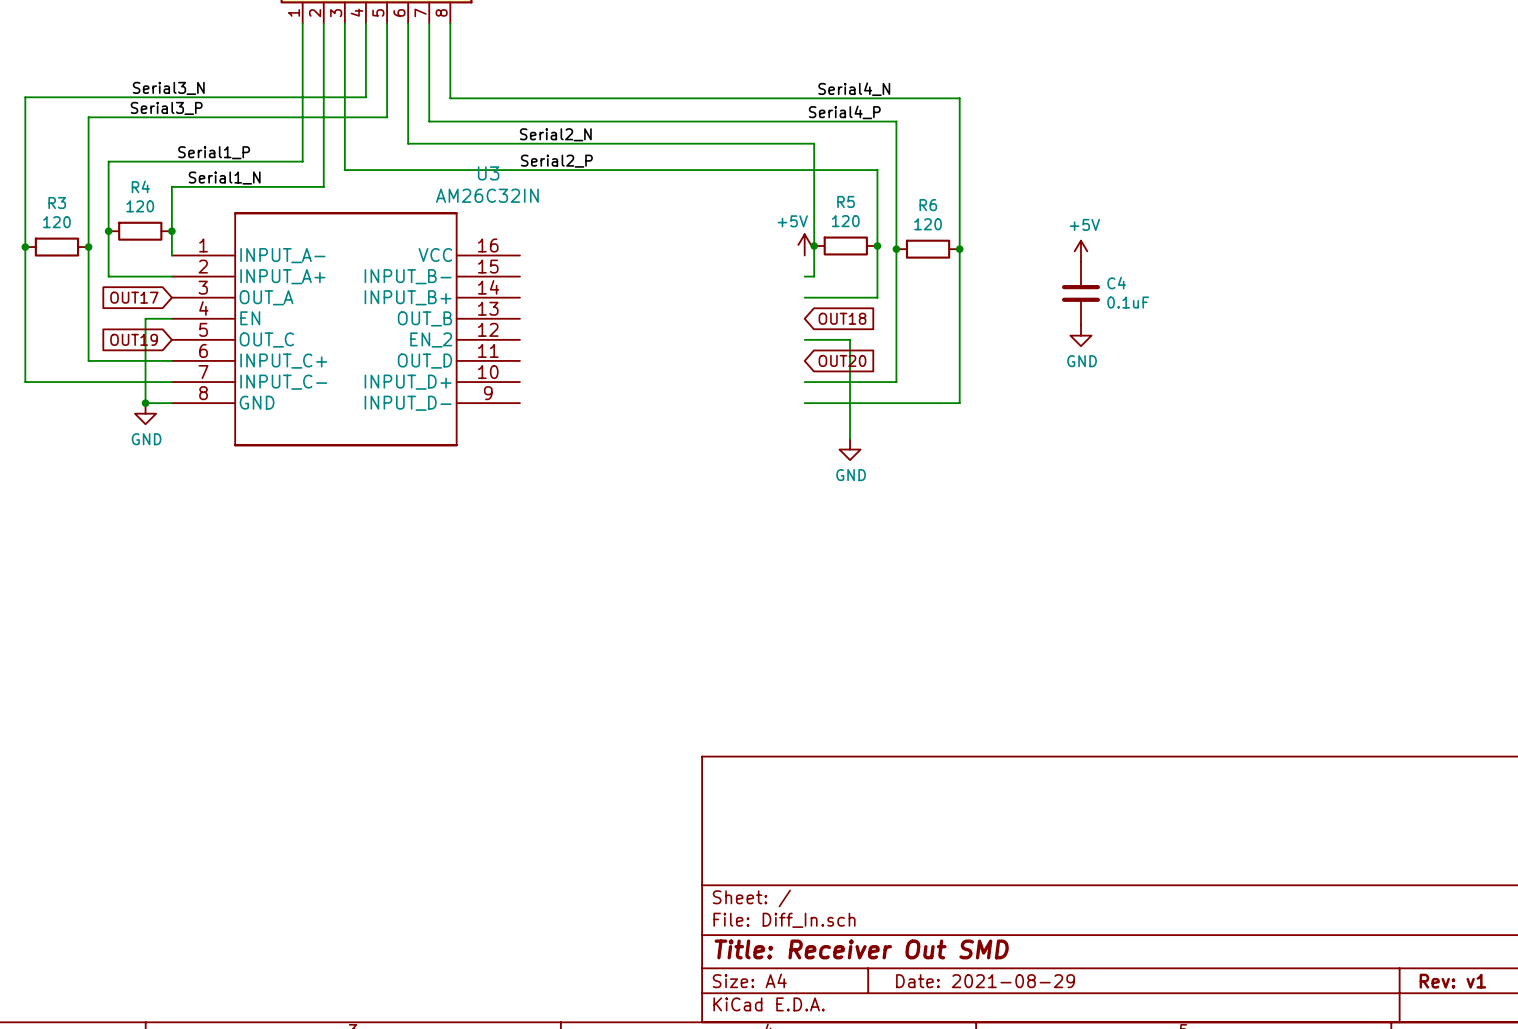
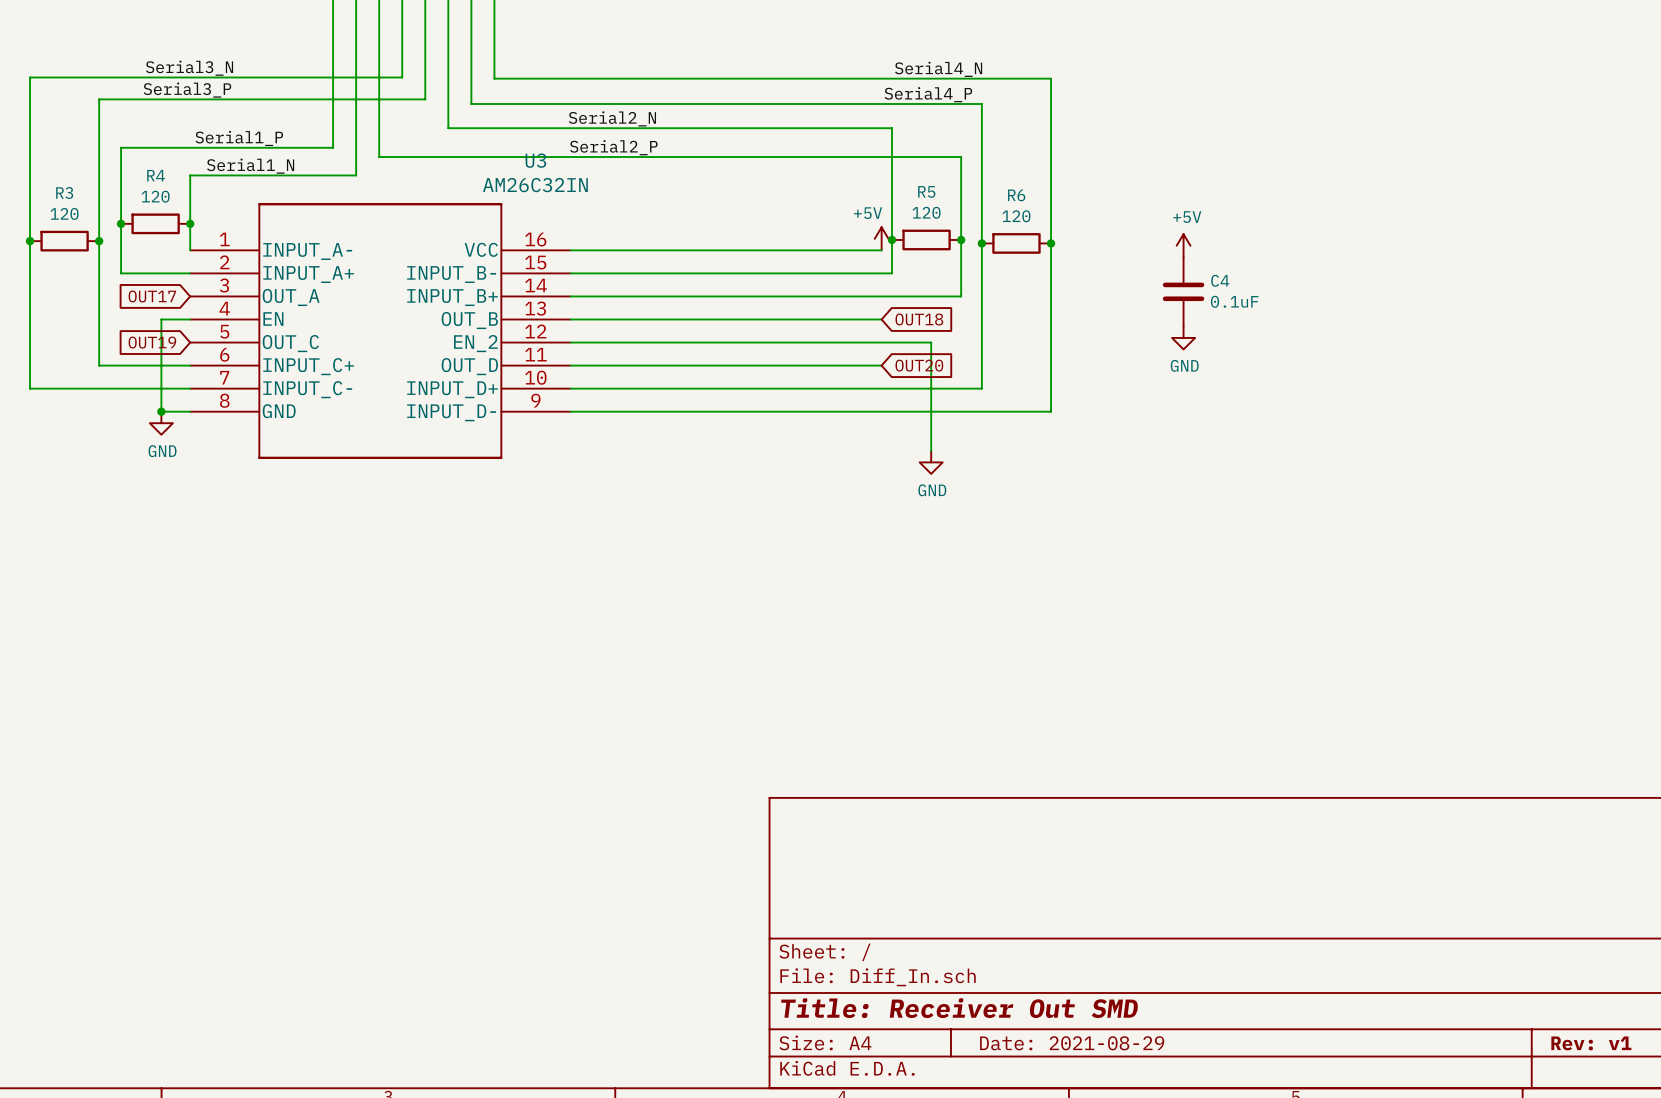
wire: none -> (570, 250) (881, 250)
wire: none -> (570, 273) (881, 273)
wire: none -> (570, 296) (881, 296)
wire: none -> (570, 319) (881, 319)
wire: none -> (570, 342) (881, 342)
wire: none -> (570, 365) (881, 365)
wire: none -> (570, 388) (881, 388)
wire: none -> (570, 411) (881, 411)

